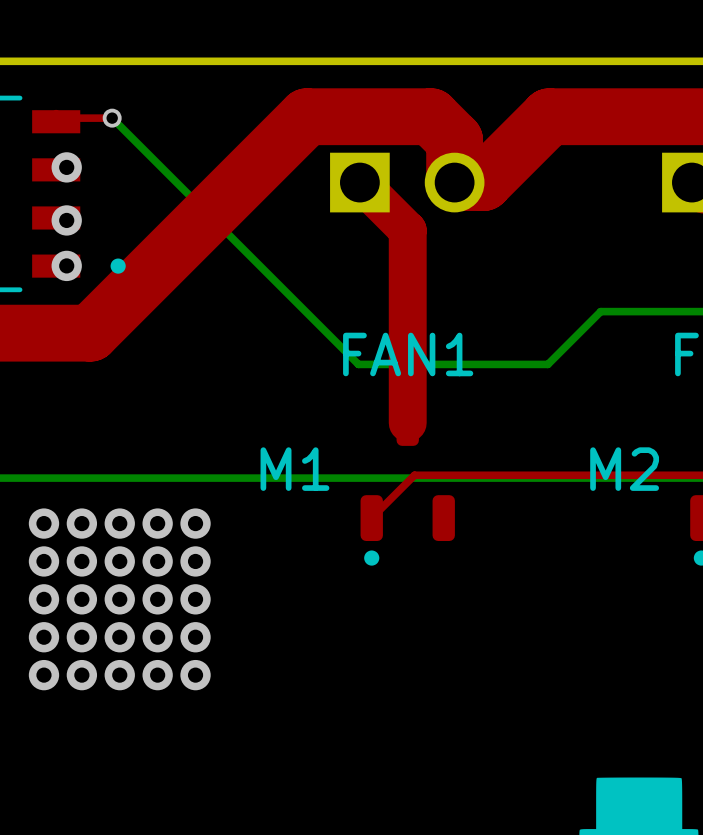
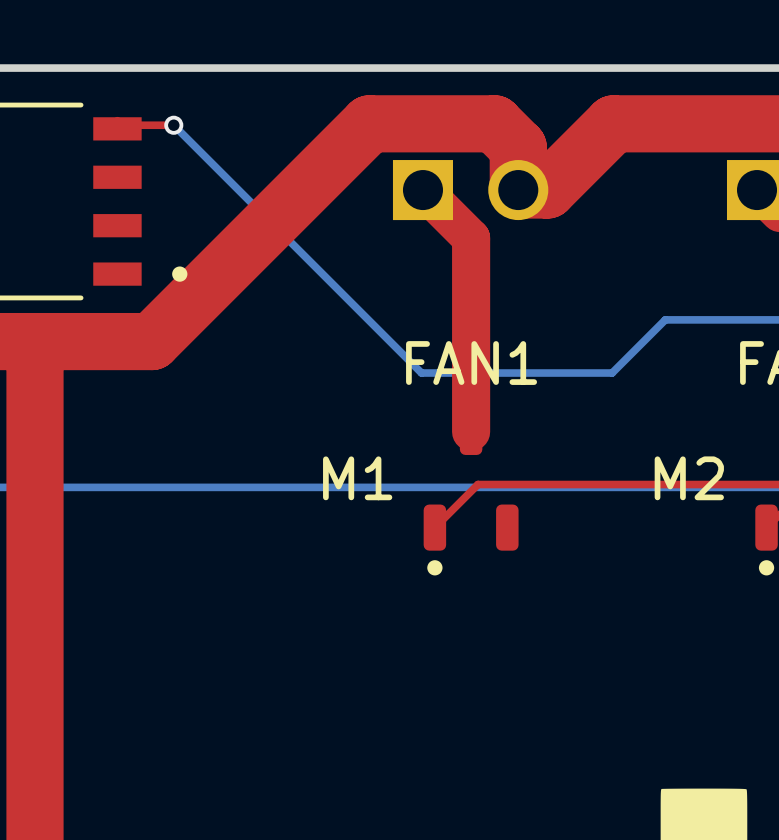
via: (66, 167) -> none
via: (66, 220) -> none
via: (66, 265) -> none
via: (43, 523) -> none
via: (81, 523) -> none
via: (119, 523) -> none
via: (157, 523) -> none
via: (195, 523) -> none
via: (43, 561) -> none
via: (81, 561) -> none
via: (119, 561) -> none
via: (157, 561) -> none
via: (195, 561) -> none
via: (43, 599) -> none
via: (81, 599) -> none
via: (119, 599) -> none
via: (157, 599) -> none
via: (195, 599) -> none
via: (43, 637) -> none
via: (81, 637) -> none
via: (119, 637) -> none
via: (157, 637) -> none
via: (195, 637) -> none
via: (43, 675) -> none
via: (81, 675) -> none
via: (119, 675) -> none
via: (157, 675) -> none
via: (195, 675) -> none

